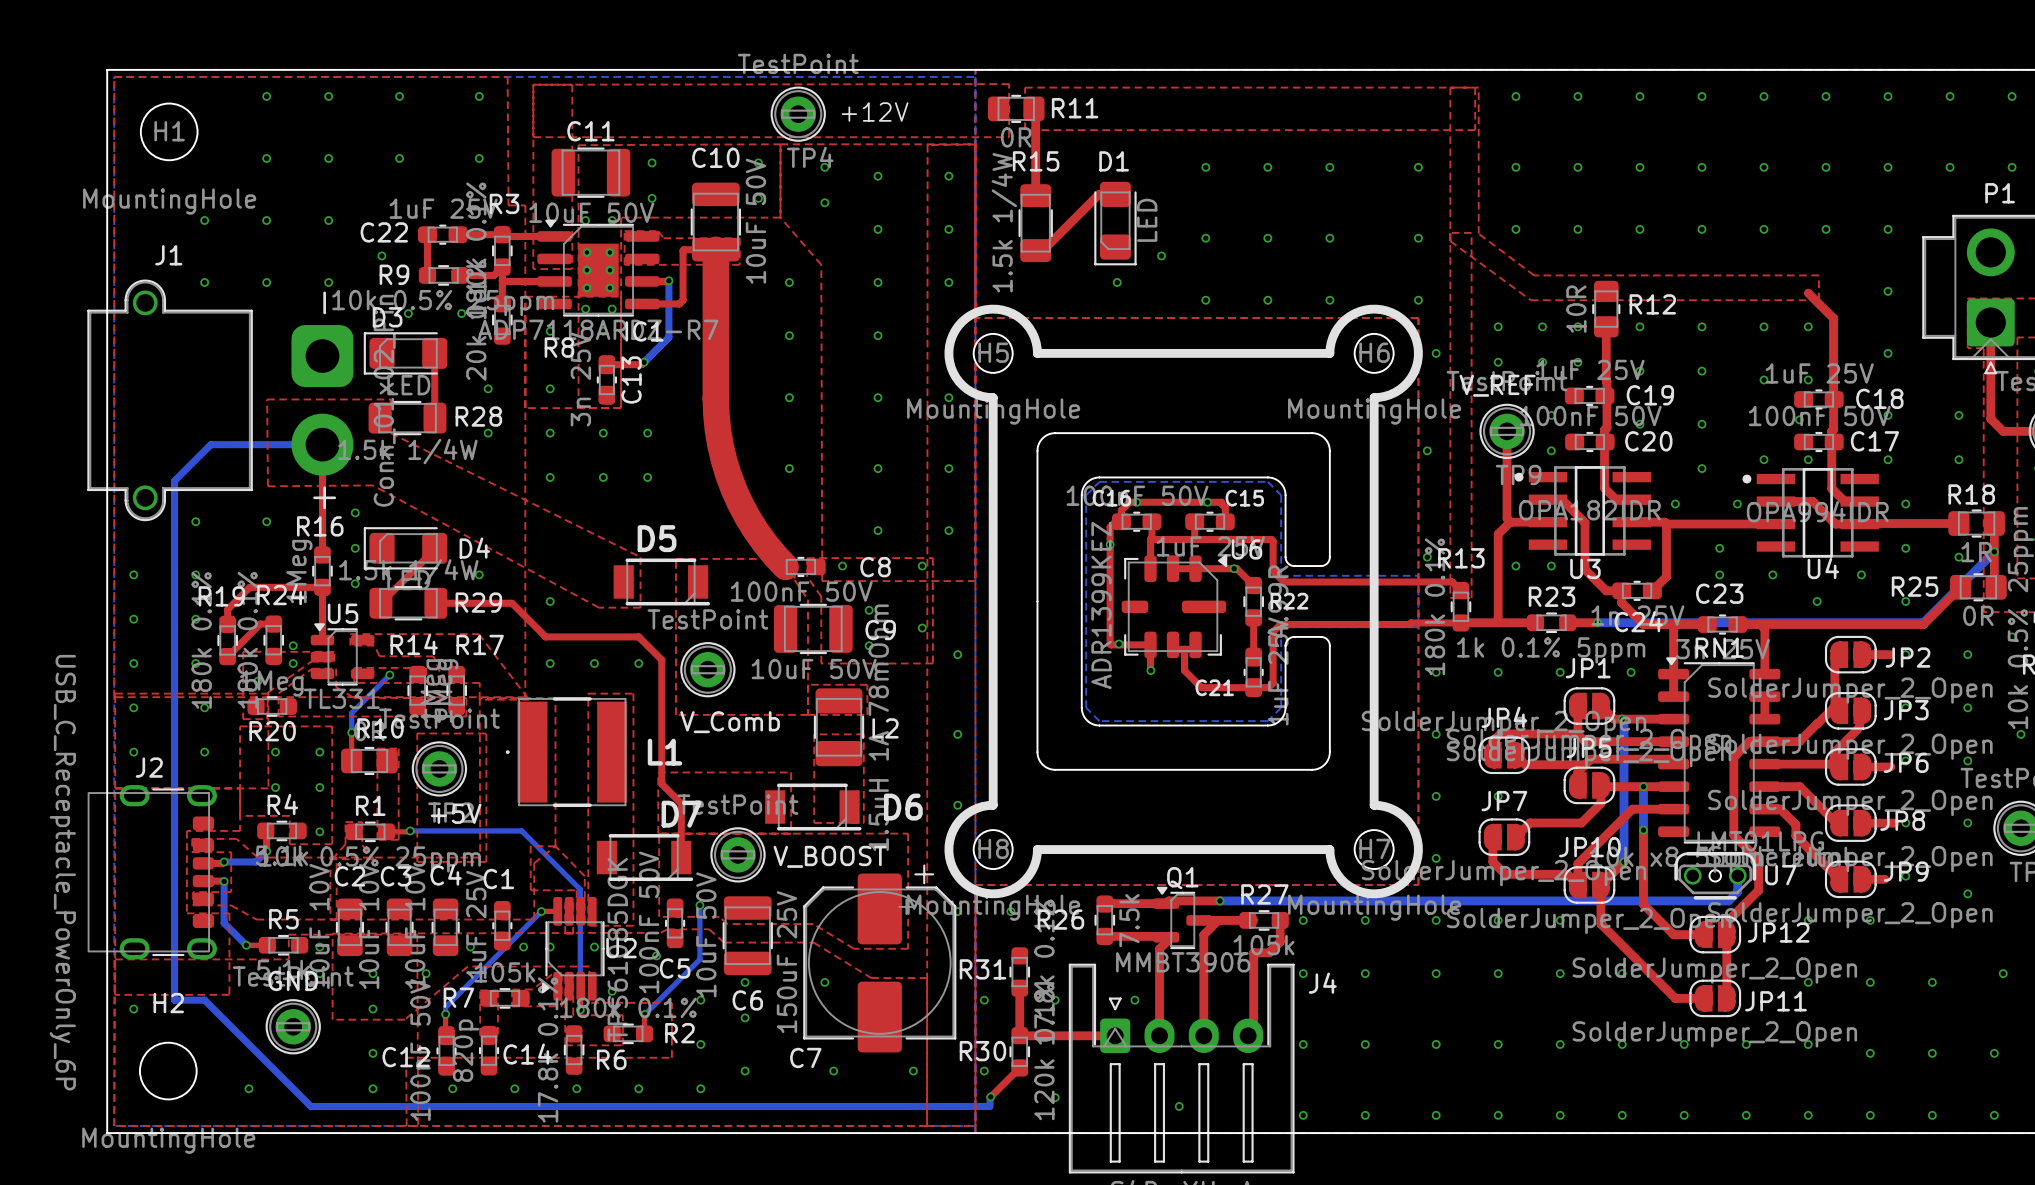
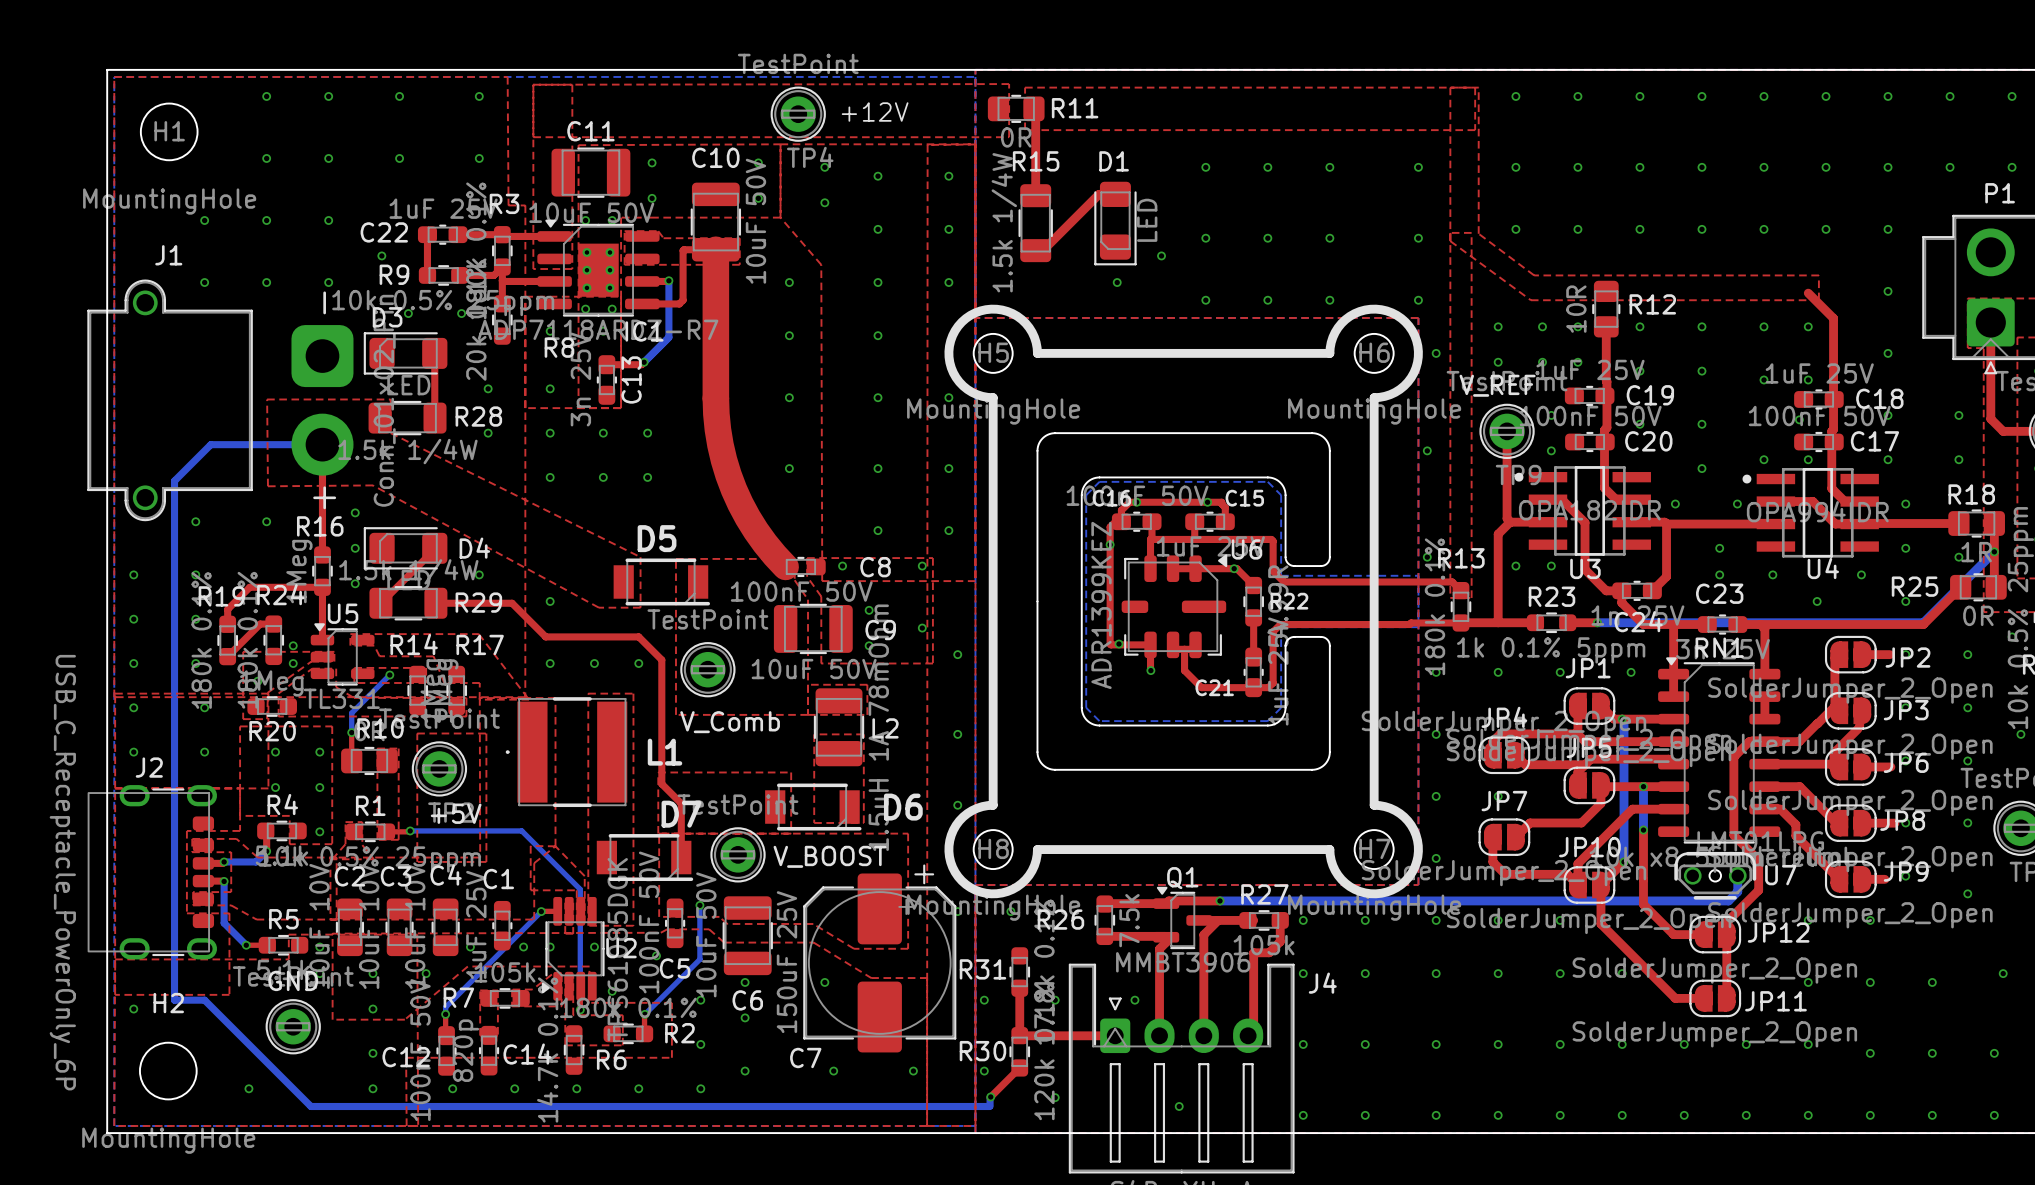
R6 value: 17.8k 0.1% (548, 1050) -> 14.7k 0.1% (547, 1050)

